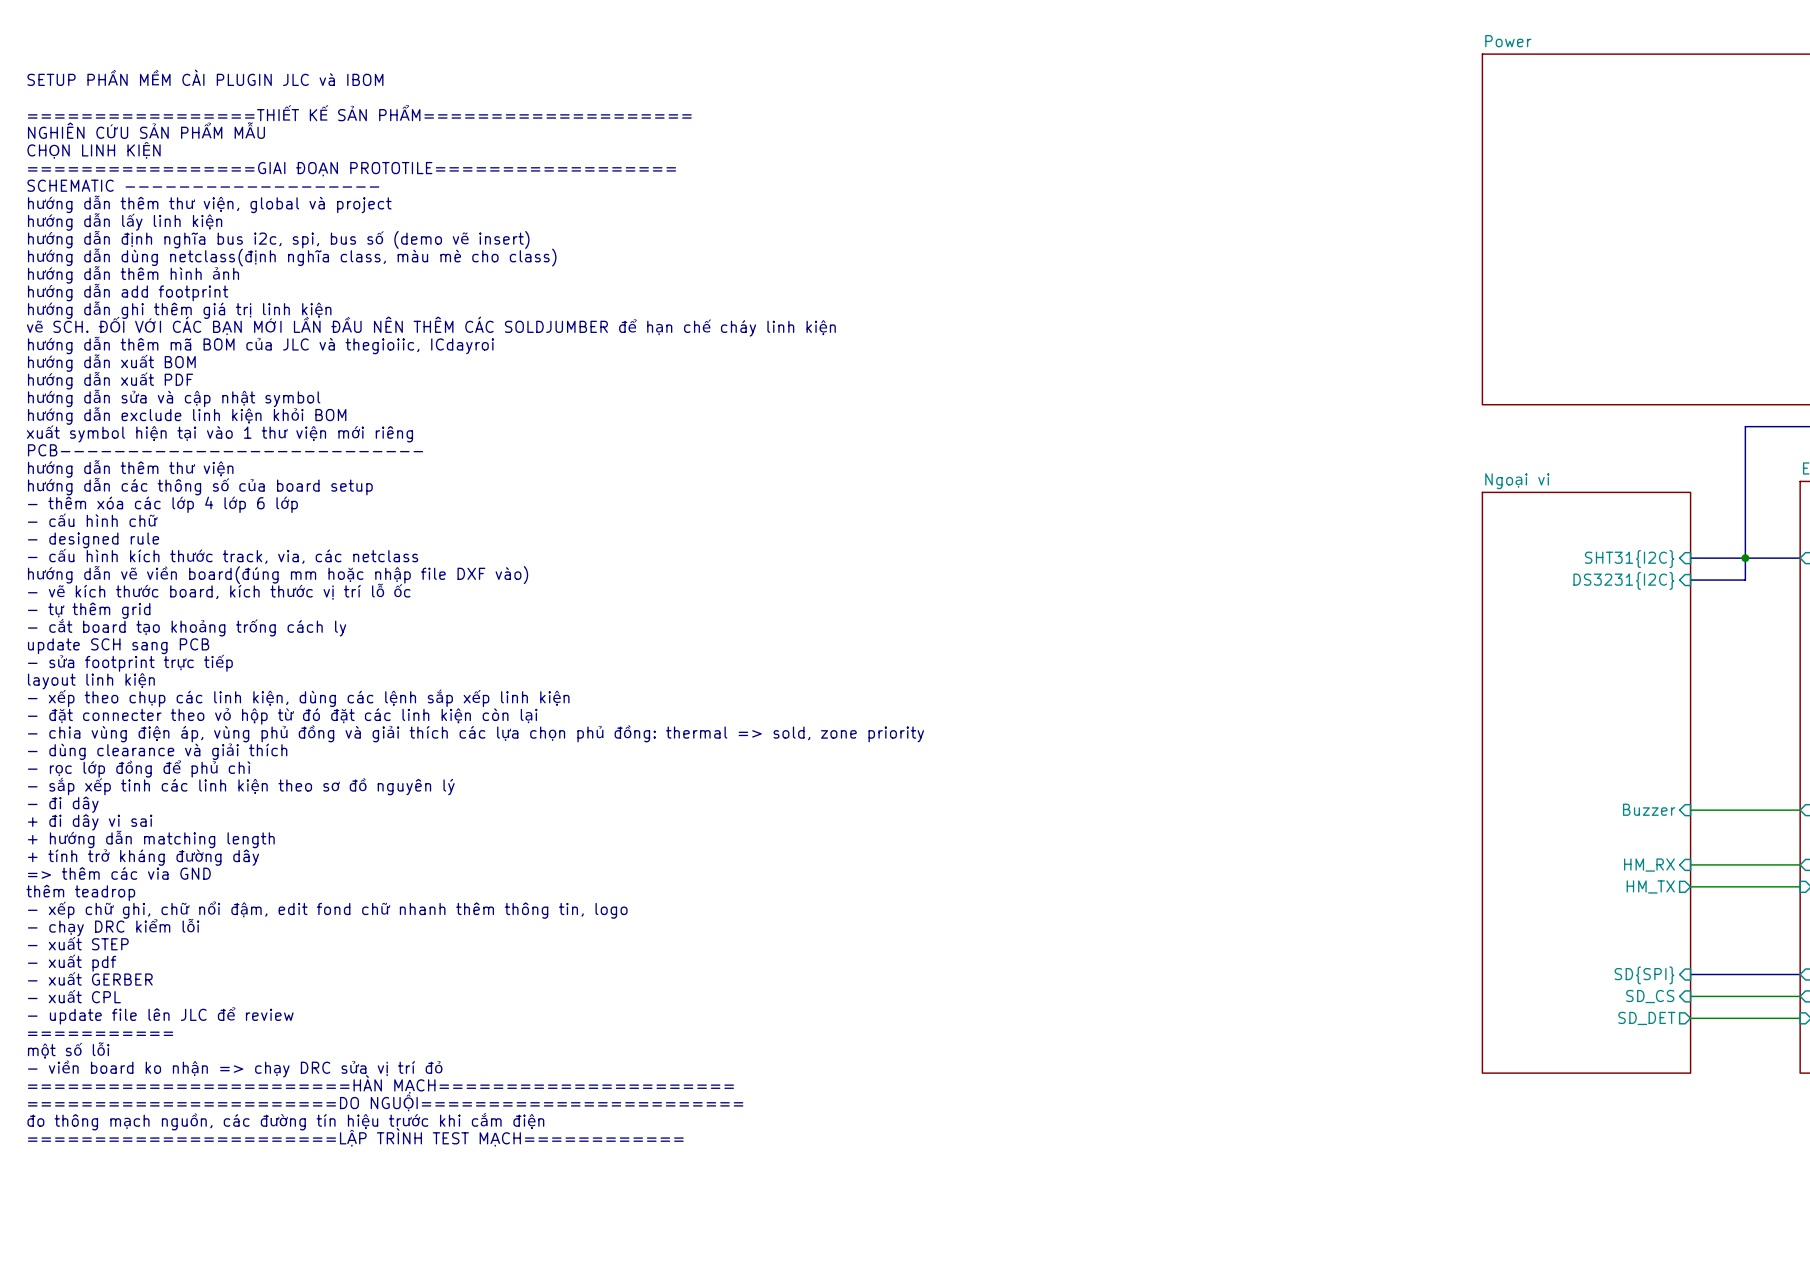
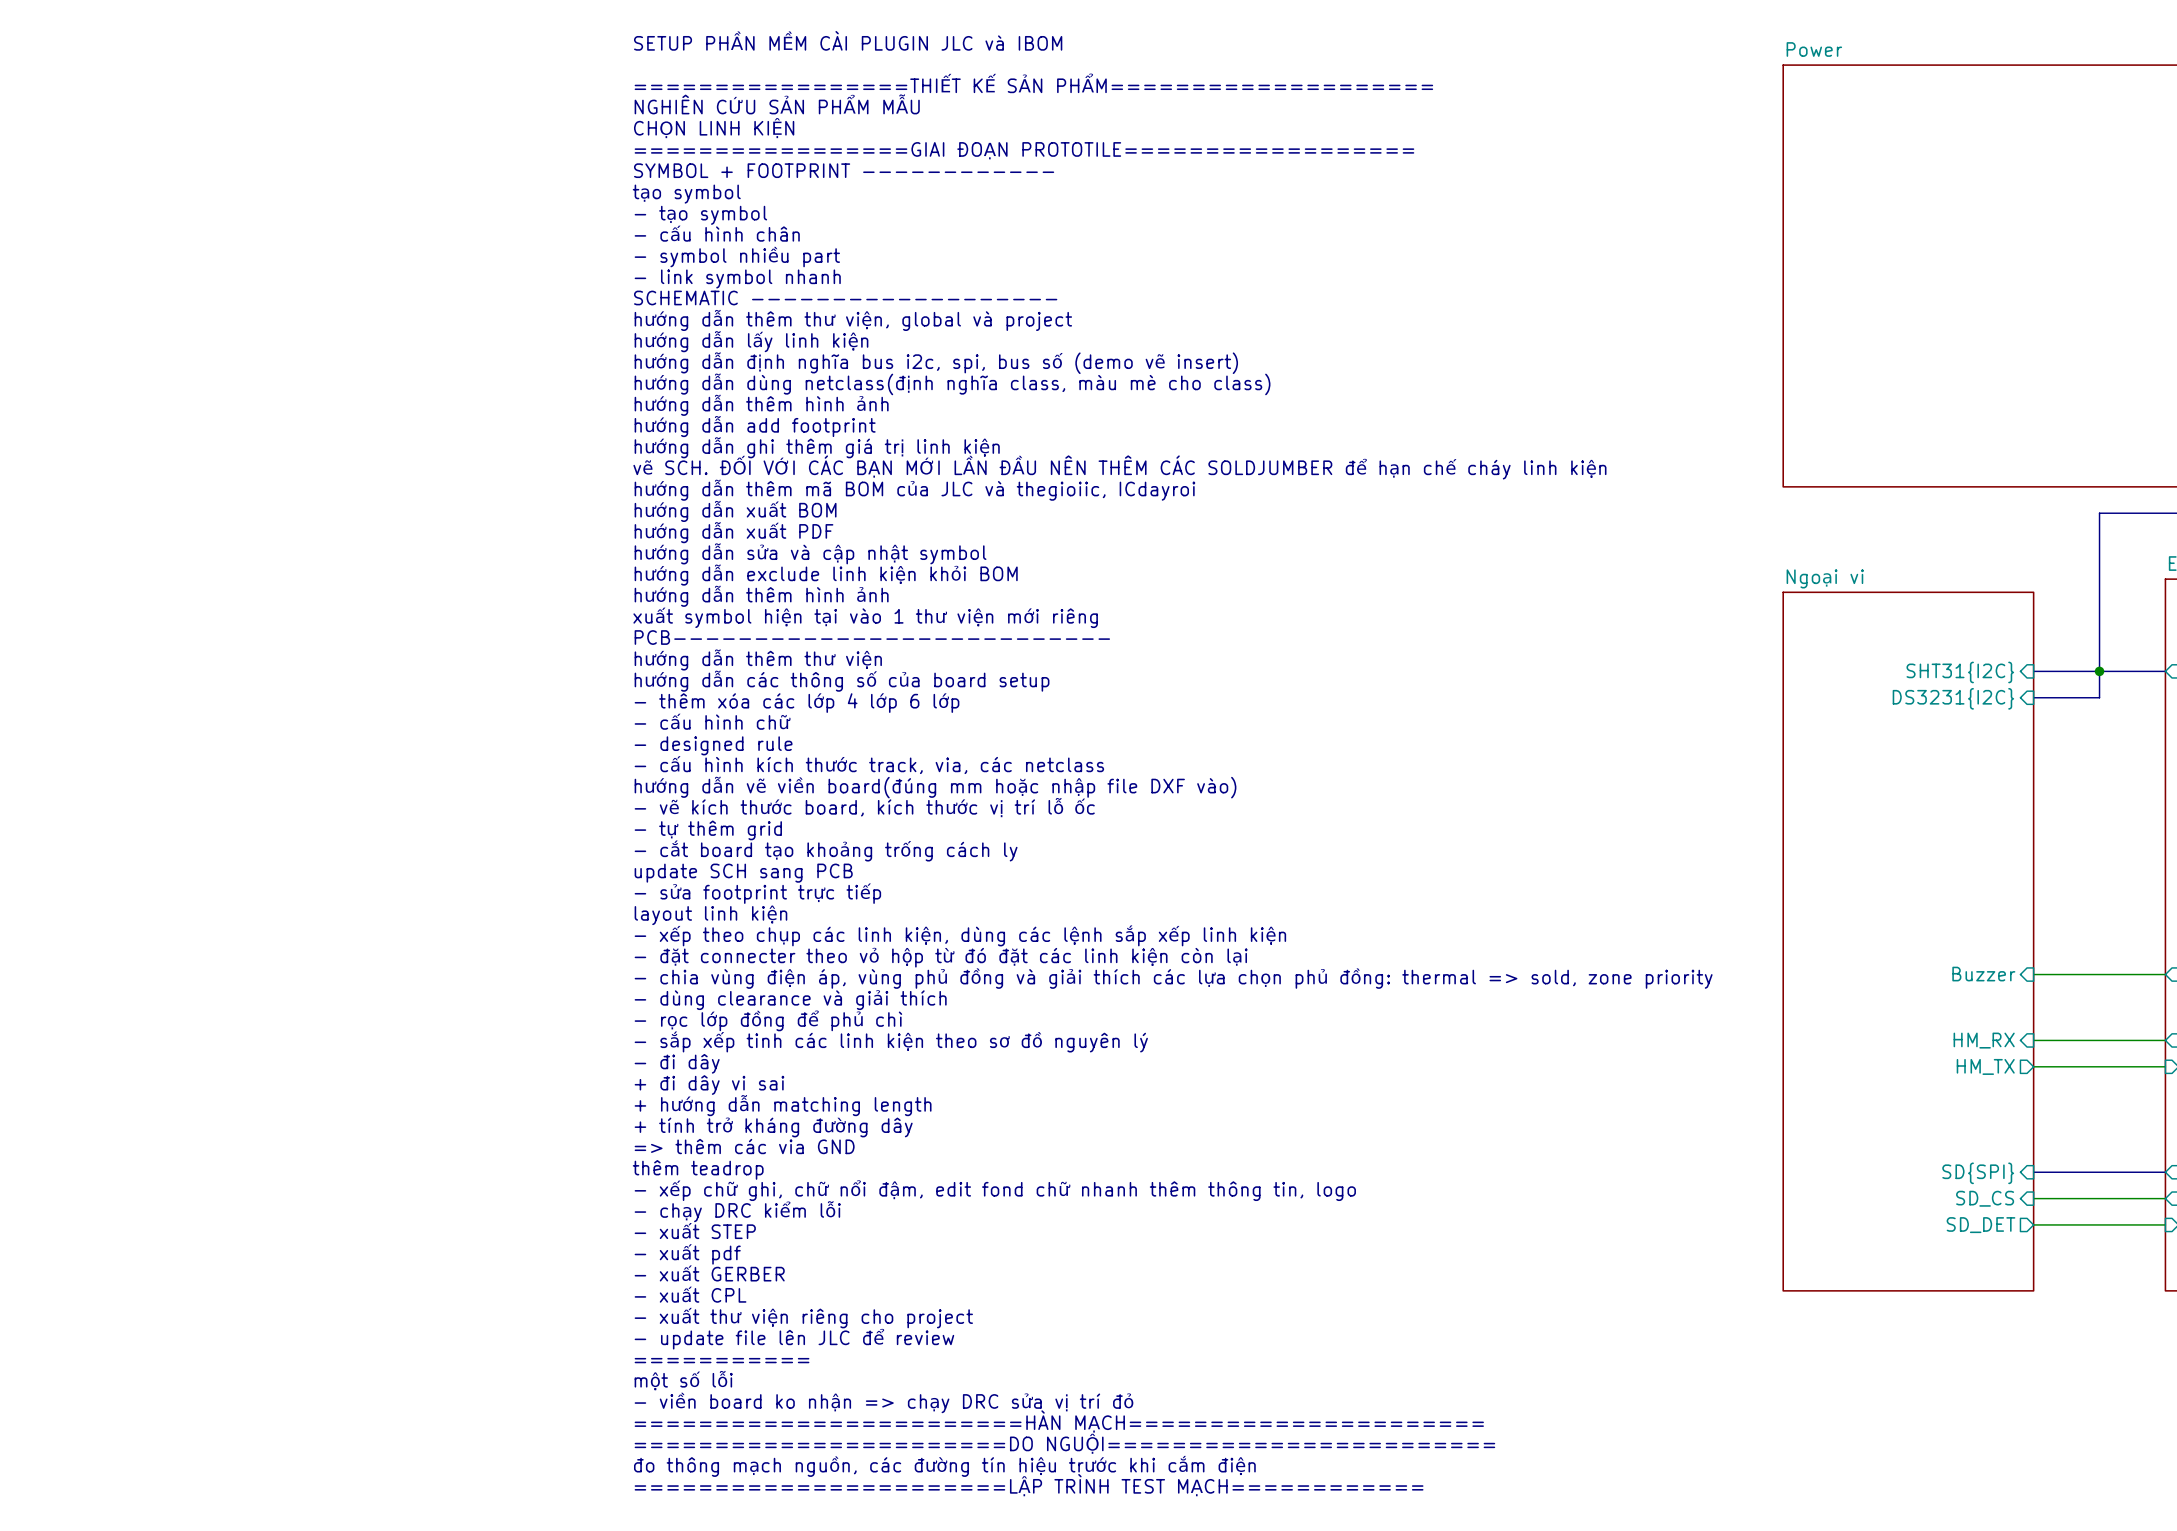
text: none -> SETUP PHẦN MỀM CÀI PLUGIN JLC và IBOM (848, 40)
text: none -> =================THIẾT KẾ SẢN PHẨM==================== (1033, 82)
text: SETUP PHẦN MỀM CÀI PLUGIN JLC và IBOM (205, 77) -> none
text: none -> NGHIÊN CỨU SẢN PHẨM MẪU (777, 104)
text: none -> CHỌN LINH KIỆN (714, 128)
text: =================THIẾT KẾ SẢN PHẨM==================== (359, 112) -> none
text: none -> =================GIAI ĐOẠN PROTOTILE================== (1024, 151)
text: NGHIÊN CỨU SẢN PHẨM MẪU (146, 130) -> none
text: none -> SYMBOL + FOOTPRINT ------------ (844, 170)
text: CHỌN LINH KIỆN (94, 150) -> none
text: none -> tạo symbol (686, 194)
text: =================GIAI ĐOẠN PROTOTILE================== (352, 169) -> none
text: none -> - tạo symbol (700, 215)
text: SCHEMATIC ------------------- (203, 185) -> none
text: none -> - cấu hình chân (717, 233)
text: hướng dẫn thêm thư viện, global và project (209, 204) -> none
text: none -> - symbol nhiều part (737, 256)
text: hướng dẫn lấy linh kiện (125, 221) -> none
text: none -> - link symbol nhanh (737, 278)
text: hướng dẫn định nghĩa bus i2c, spi, bus số (demo vẽ insert) (278, 239) -> none
text: none -> SCHEMATIC ------------------- (845, 298)
text: hướng dẫn dùng netclass(định nghĩa class, màu mè cho class) (292, 257) -> none
text: none -> hướng dẫn thêm thư viện, global và project (853, 320)
text: hướng dẫn thêm hình ảnh (133, 274) -> none
text: none -> hướng dẫn lấy linh kiện (751, 341)
text: hướng dẫn add footprint (128, 292) -> none
text: none -> hướng dẫn định nghĩa bus i2c, spi, bus số (demo vẽ insert) (936, 362)
text: hướng dẫn ghi thêm giá trị linh kiện (179, 309) -> none
text: none -> hướng dẫn dùng netclass(định nghĩa class, màu mè cho class) (952, 384)
text: vẽ SCH. ĐỐI VỚI CÁC BẠN MỚI LẦN ĐẦU NÊN THÊM CÁC SOLDJUMBER để hạn chế cháy linh kiện (431, 326) -> none
text: none -> hướng dẫn thêm hình ảnh (761, 404)
text: hướng dẫn thêm mã BOM của JLC và thegioiic, ICdayroi (260, 345) -> none
text: none -> hướng dẫn add footprint (755, 426)
text: hướng dẫn xuất BOM (111, 362) -> none
text: none -> hướng dẫn ghi thêm giá trị linh kiện (817, 447)
text: hướng dẫn xuất PDF (110, 380) -> none
text: none -> vẽ SCH. ĐỐI VỚI CÁC BẠN MỚI LẦN ĐẦU NÊN THÊM CÁC SOLDJUMBER để hạn chế cháy linh kiện (1119, 467)
text: hướng dẫn sửa và cập nhật symbol (174, 398) -> none
text: none -> hướng dẫn thêm mã BOM của JLC và thegioiic, ICdayroi (914, 489)
text: hướng dẫn exclude linh kiện khỏi BOM (187, 415) -> none
text: none -> hướng dẫn xuất BOM (735, 511)
text: xuất symbol hiện tại vào 1 thư viện mới riêng (219, 433) -> none
text: none -> hướng dẫn xuất PDF (734, 532)
text: PCB--------------------------- (225, 450) -> none
text: none -> hướng dẫn sửa và cập nhật symbol (810, 553)
text: hướng dẫn thêm thư viện (130, 468) -> none
text: none -> hướng dẫn exclude linh kiện khỏi BOM (826, 574)
text: hướng dẫn các thông số của board setup (200, 486) -> none
text: none -> hướng dẫn thêm hình ảnh (761, 595)
text: - thêm xóa các lớp 4 lớp 6 lớp (162, 504) -> none
text: none -> xuất symbol hiện tại vào 1 thư viện mới riêng (865, 617)
text: - cấu hình chữ (93, 520) -> none
text: none -> PCB--------------------------- (872, 637)
text: - designed rule (93, 540) -> none
text: none -> hướng dẫn thêm thư viện (758, 659)
text: - cấu hình kích thước track, via, các netclass (223, 556) -> none
text: none -> hướng dẫn các thông số của board setup (842, 680)
text: hướng dẫn vẽ viền board(đúng mm hoặc nhập file DXF vào) (278, 574) -> none
text: none -> - thêm xóa các lớp 4 lớp 6 lớp (796, 702)
text: - vẽ kích thước board, kích thước vị trí lỗ ốc (219, 591) -> none
text: none -> - cấu hình chữ (712, 721)
text: - tự thêm grid (89, 610) -> none
text: none -> - designed rule (713, 745)
text: - cắt board tạo khoảng trống cách ly (187, 627) -> none
text: none -> - cấu hình kích thước track, via, các netclass (869, 764)
text: update SCH sang PCB (118, 646) -> none
text: none -> hướng dẫn vẽ viền board(đúng mm hoặc nhập file DXF vào) (935, 787)
text: - sửa footprint trực tiếp (130, 662) -> none
text: none -> - vẽ kích thước board, kích thước vị trí lỗ ốc (864, 807)
text: layout linh kiện (91, 680) -> none
text: none -> - tự thêm grid (708, 830)
text: - xếp theo chụp các linh kiện, dùng các lệnh sắp xếp linh kiện (298, 698) -> none
text: none -> - cắt board tạo khoảng trống cách ly (826, 850)
text: - đặt connecter theo vỏ hộp từ đó đặt các linh kiện còn lại (282, 716) -> none
text: none -> update SCH sang PCB (743, 873)
text: - chia vùng điện áp, vùng phủ đồng và giải thích các lựa chọn phủ đồng: thermal => sold, zone priority (475, 733) -> none
text: none -> - sửa footprint trực tiếp (757, 893)
text: - dùng clearance và giải thích (157, 751) -> none
text: none -> layout linh kiện (710, 914)
text: - rọc lớp đồng để phủ chì (139, 768) -> none
text: none -> - xếp theo chụp các linh kiện, dùng các lệnh sắp xếp linh kiện (960, 935)
text: - sắp xếp tinh các linh kiện theo sơ đồ nguyên lý (241, 786) -> none
text: none -> - đặt connecter theo vỏ hộp từ đó đặt các linh kiện còn lại (941, 957)
text: - đi dây (63, 804) -> none
text: none -> - chia vùng điện áp, vùng phủ đồng và giải thích các lựa chọn phủ đồng: thermal => sold, zone priority (1173, 978)
text: + đi dây vi sai (90, 822) -> none
text: none -> - dùng clearance và giải thích (790, 999)
text: + hướng dẫn matching length (151, 839) -> none
text: none -> - rọc lớp đồng để phủ chì (768, 1020)
text: + tính trở kháng đường dây (143, 857) -> none
text: none -> - sắp xếp tinh các linh kiện theo sơ đồ nguyên lý (891, 1041)
text: => thêm các via GND (119, 873) -> none
text: none -> - đi dây (677, 1063)
text: thêm teadrop (80, 892) -> none
text: none -> + đi dây vi sai (709, 1085)
text: - xếp chữ ghi, chữ nổi đậm, edit fond chữ nhanh thêm thông tin, logo (327, 909) -> none
text: none -> + hướng dẫn matching length (783, 1105)
text: - chạy DRC kiểm lỗi (113, 927) -> none
text: none -> + tính trở kháng đường dây (773, 1127)
text: - xuất STEP (78, 943) -> none
text: none -> => thêm các via GND (744, 1146)
text: - xuất pdf (72, 962) -> none
text: none -> thêm teadrop (698, 1169)
text: - xuất GERBER (90, 978) -> none
text: none -> - xếp chữ ghi, chữ nổi đậm, edit fond chữ nhanh thêm thông tin, logo (995, 1190)
text: - xuất CPL (74, 996) -> none
text: none -> - chạy DRC kiểm lỗi (737, 1211)
text: - update file lên JLC để review (160, 1015) -> none
text: none -> - xuất STEP (695, 1230)
text: =========== (100, 1033) -> none
text: none -> - xuất pdf (687, 1254)
text: một số lỗi (68, 1050) -> none
text: none -> - xuất GERBER (709, 1273)
text: - viền board ko nhận => chạy DRC sửa vị trí đỏ (235, 1068) -> none
text: none -> - xuất CPL (690, 1294)
text: ========================HÀN MẠCH====================== (380, 1084) -> none
text: none -> - xuất thư viện riêng cho project (803, 1317)
text: =======================DO NGUỘI======================== (385, 1102) -> none
text: none -> - update file lên JLC để review (794, 1338)
text: đo thông mạch nguồn, các đường tín hiệu trước khi cắm điện (285, 1121) -> none
text: none -> =========== (722, 1360)
text: =======================LẬP TRÌNH TEST MẠCH============ (355, 1137) -> none
text: none -> một số lỗi (683, 1380)
text: none -> - viền board ko nhận => chạy DRC sửa vị trí đỏ (884, 1402)
text: none -> ========================HÀN MẠCH====================== (1059, 1421)
text: none -> =======================DO NGUỘI======================== (1064, 1443)
text: none -> đo thông mạch nguồn, các đường tín hiệu trước khi cắm điện (944, 1466)
text: none -> =======================LẬP TRÌNH TEST MẠCH============ (1029, 1485)

